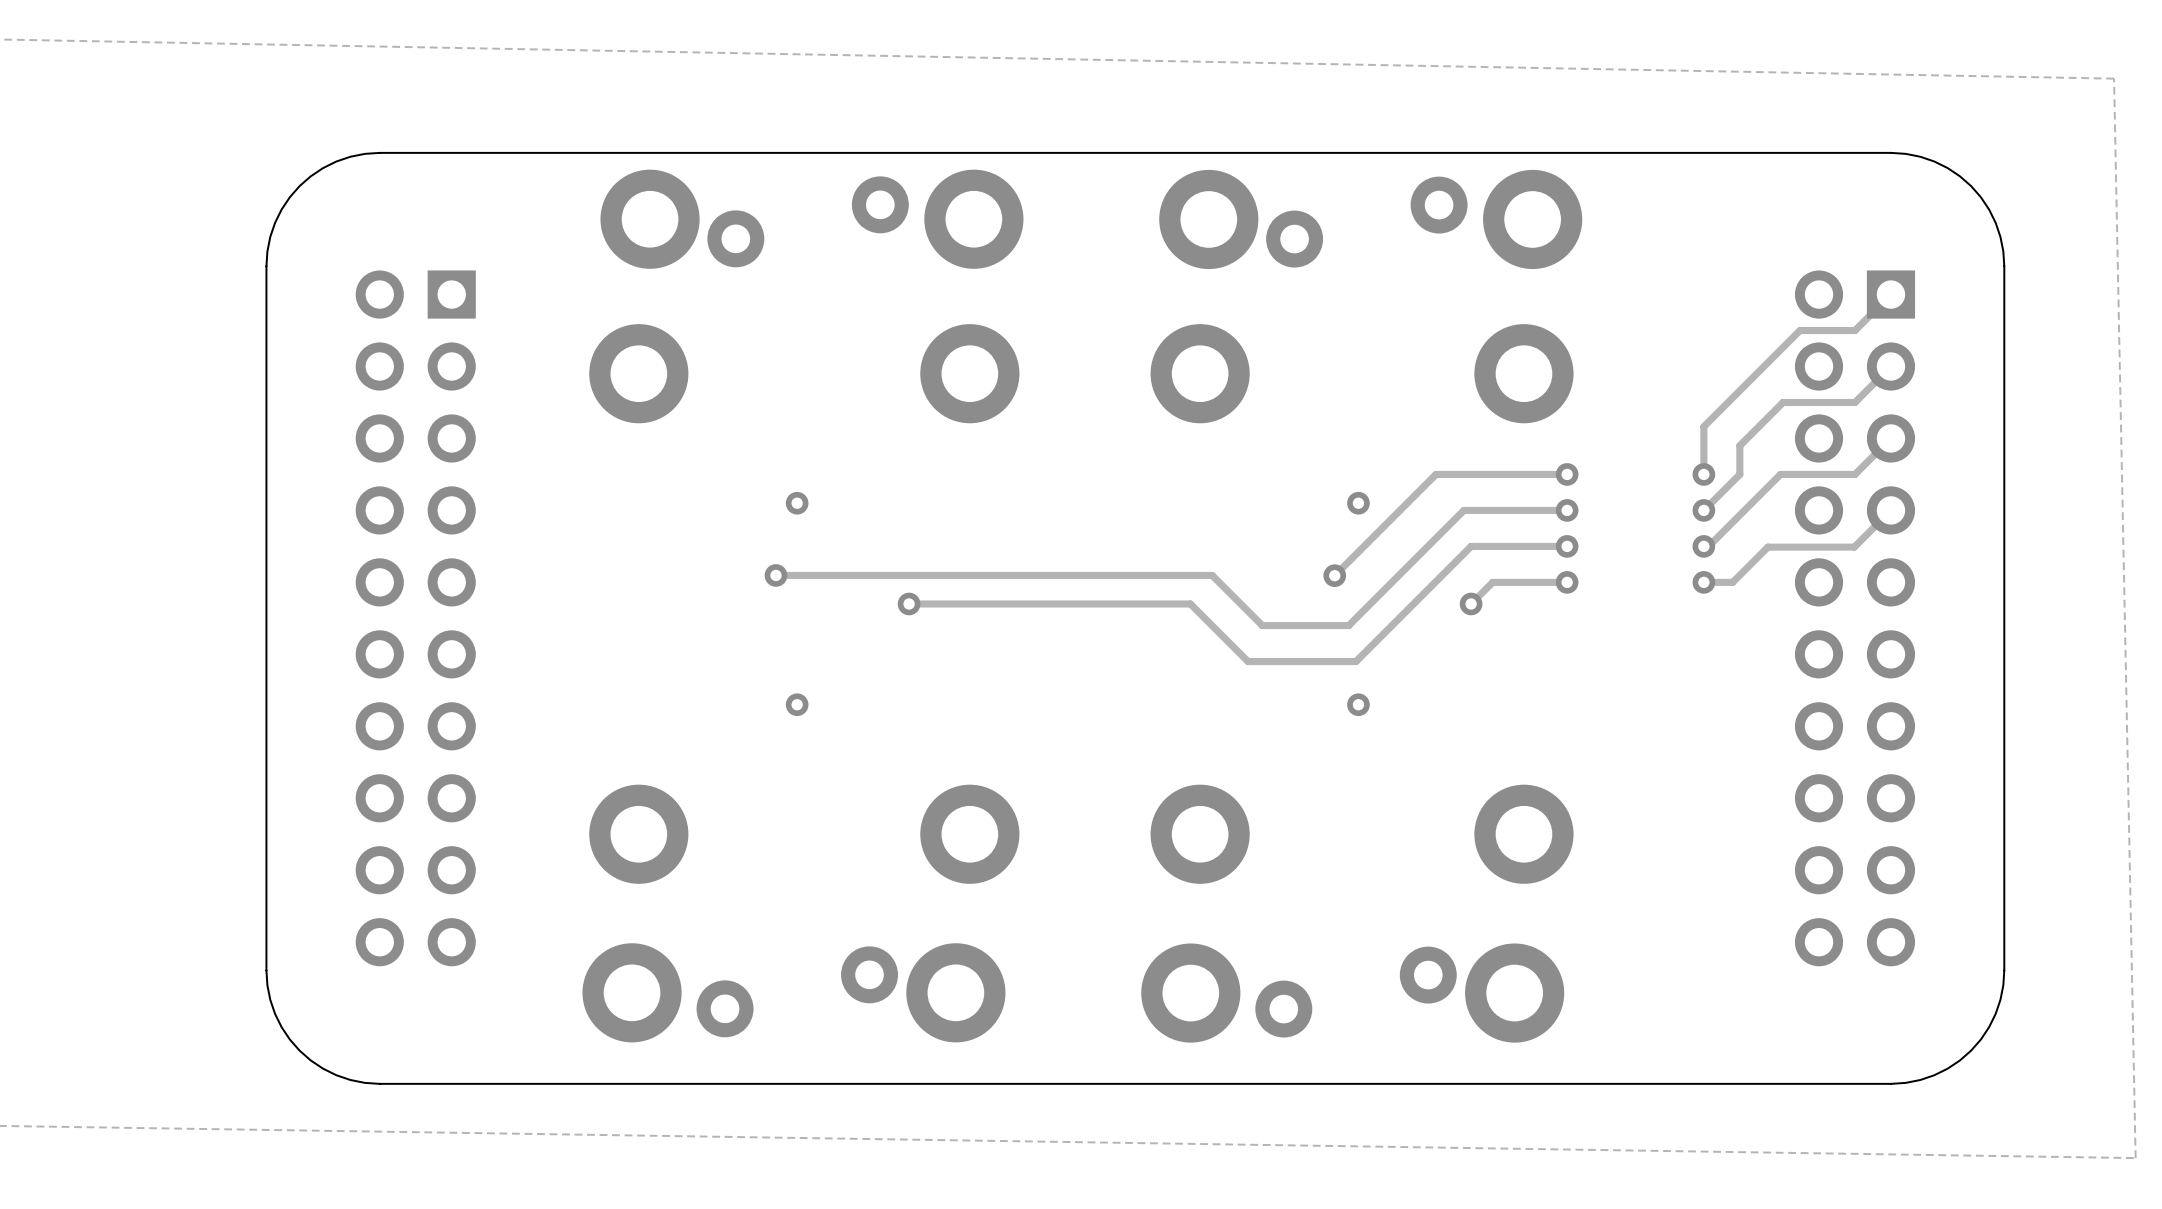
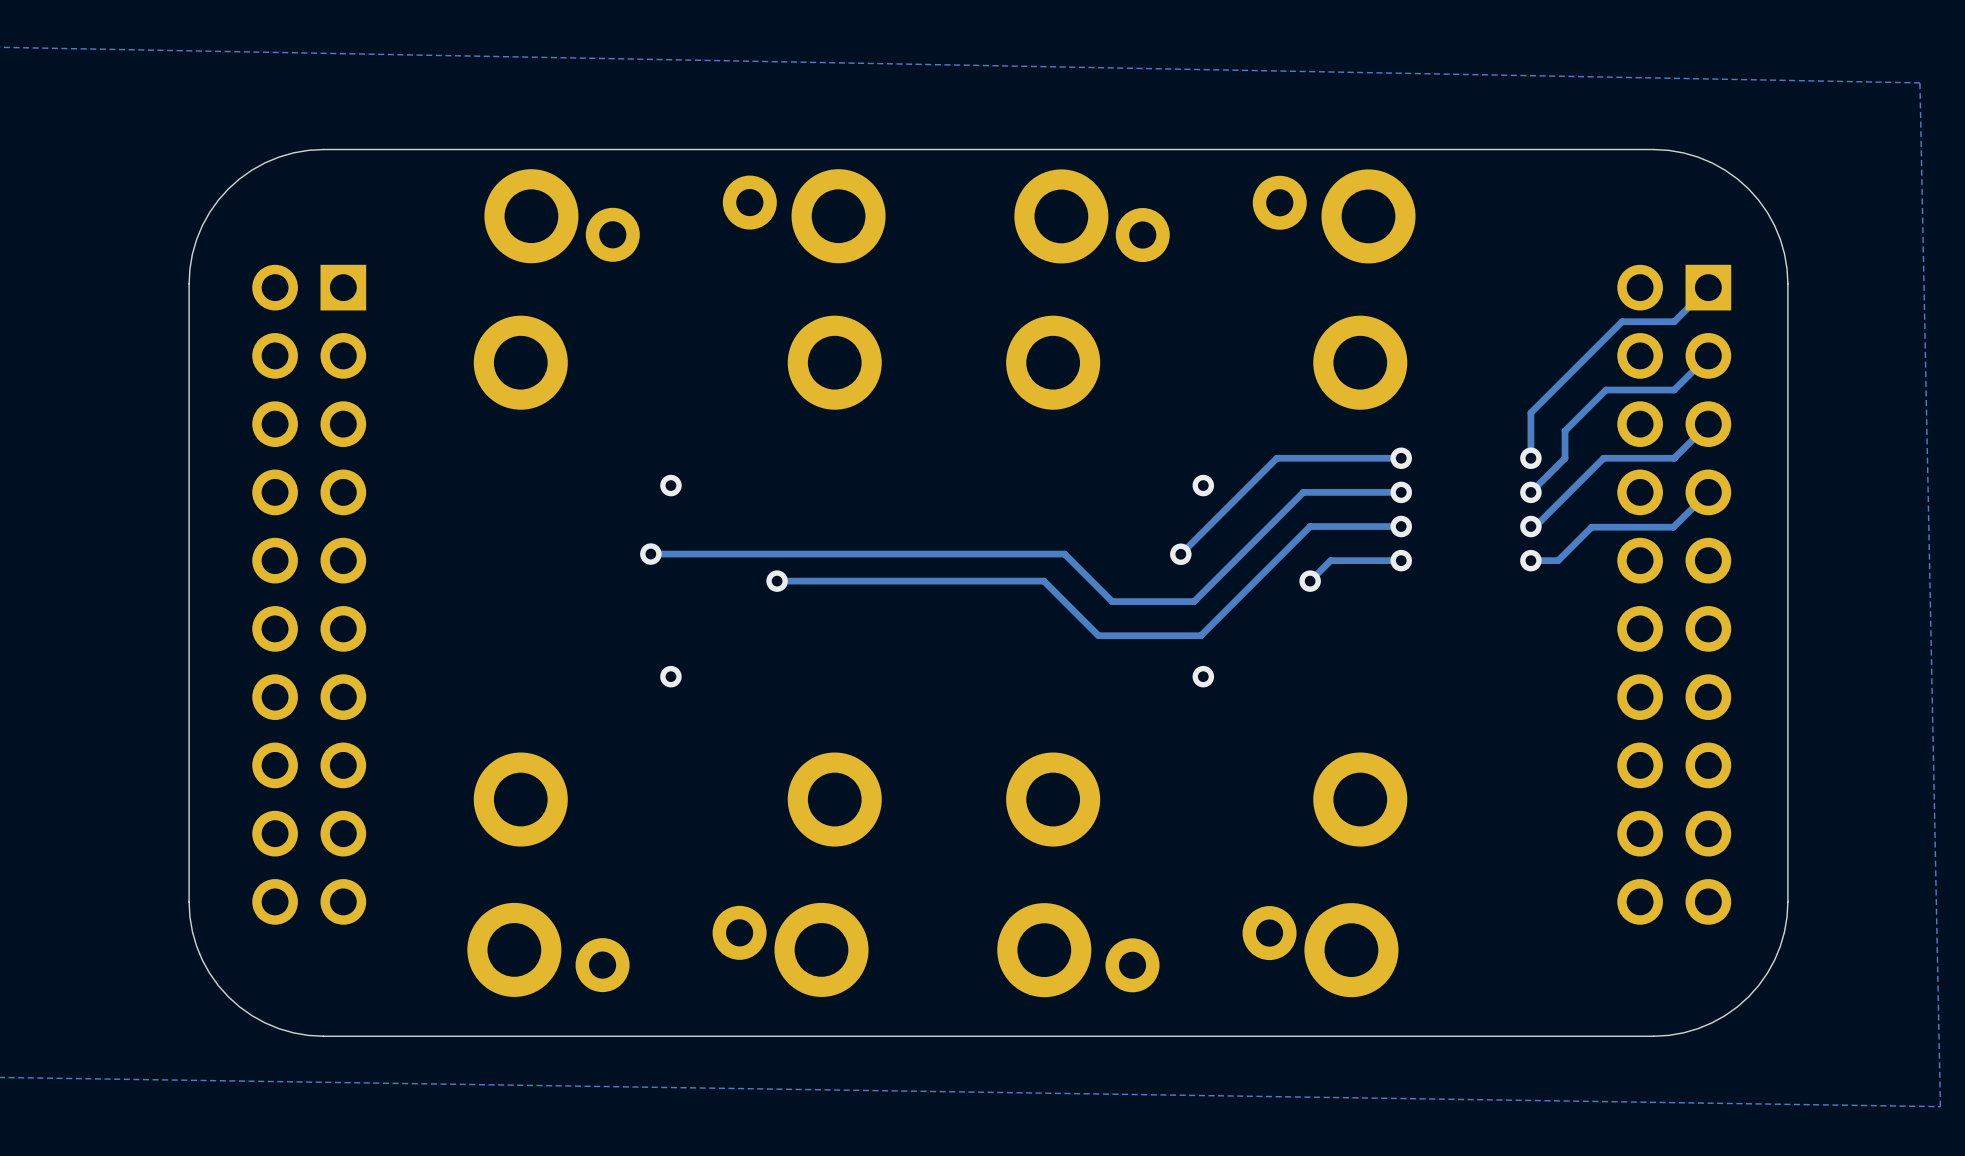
board edge: (1833, 1083) (1905, 1082) (1920, 1080) (1947, 1068) (1959, 1060) (1980, 1039) (1995, 1013) (2003, 985) (2003, 251) (1995, 222) (1980, 197) (1971, 186) (1947, 168) (1934, 161) (1905, 153) (379, 152) (350, 156) (323, 168) (299, 186) (281, 209) (275, 222) (267, 251) (267, 985) (275, 1013) (281, 1027) (299, 1050) (323, 1068) (350, 1080) (364, 1082) (430, 1083) -> (1653, 1036) (1668, 1035) (1697, 1028) (1725, 1015) (1748, 996) (1767, 973) (1780, 946) (1787, 916) (1787, 901) (1787, 283) (1784, 253) (1780, 239) (1767, 212) (1748, 188) (1737, 178) (1711, 162) (1697, 157) (1683, 152) (1653, 149) (323, 149) (293, 152) (279, 157) (251, 170) (228, 188) (209, 212) (196, 239) (189, 268) (189, 916) (196, 946) (202, 960) (209, 973) (228, 996) (251, 1015) (279, 1028) (308, 1035) (323, 1036)

